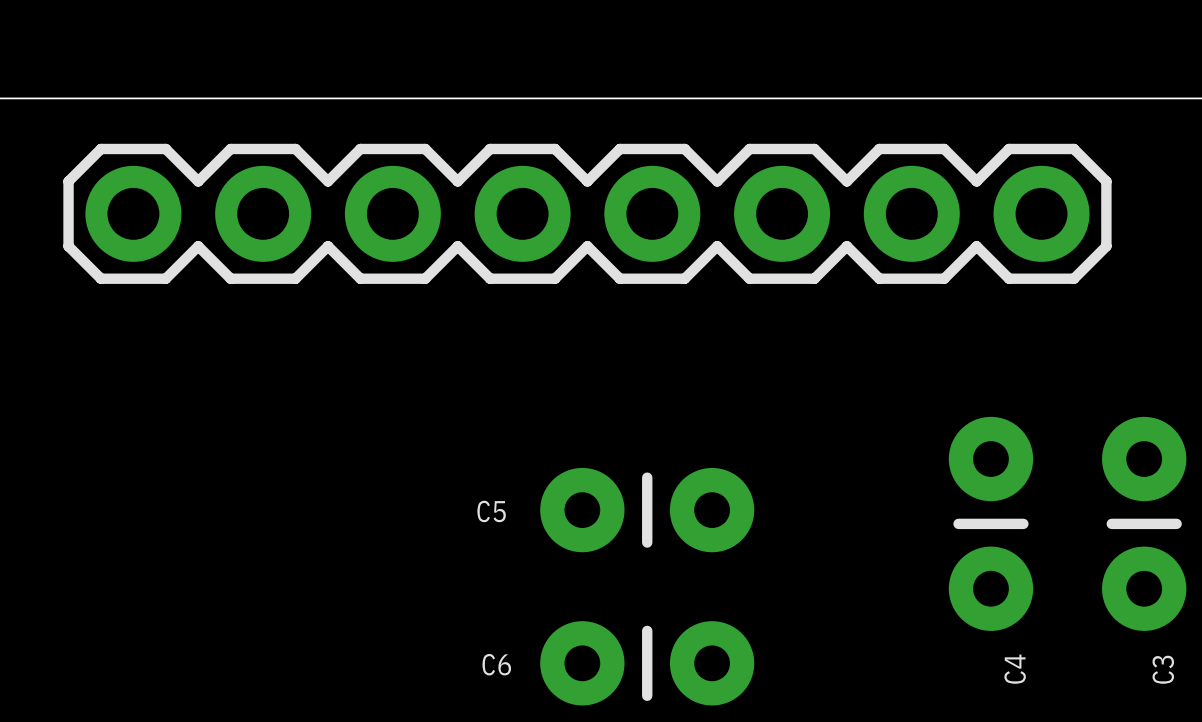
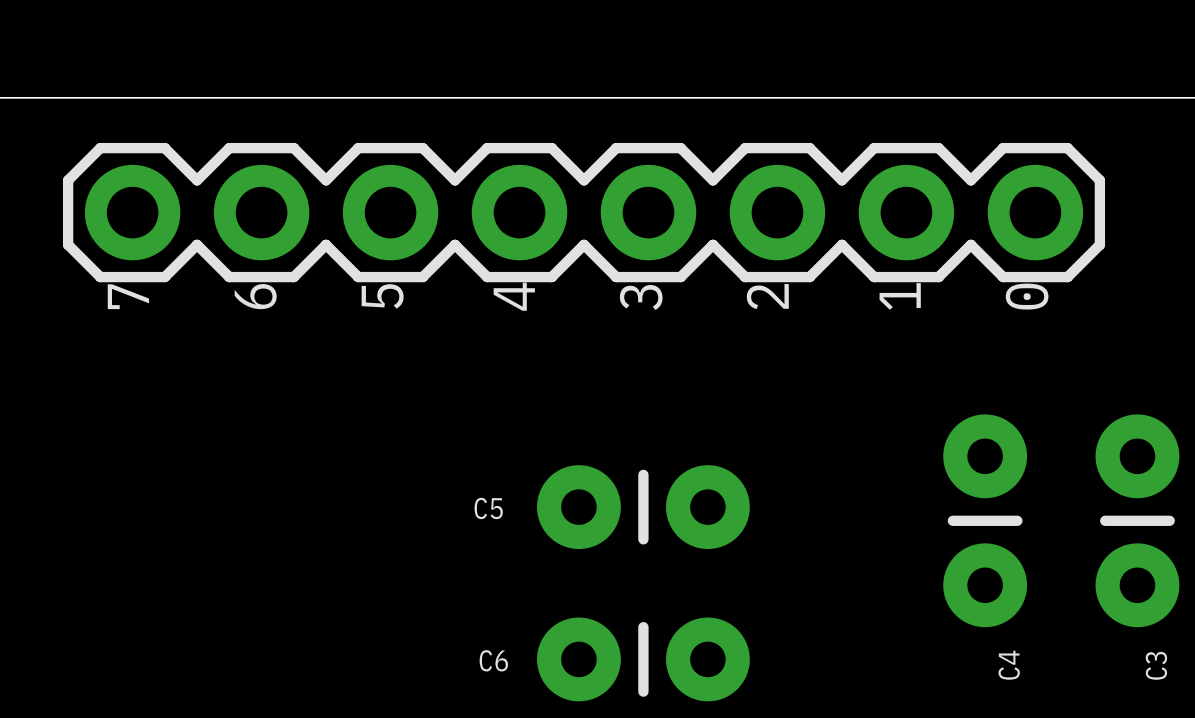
text: none -> 7 (128, 296)
text: none -> 6 (255, 296)
text: none -> 5 (382, 296)
text: none -> 4 (514, 296)
text: none -> 2 (767, 296)
text: none -> 1 (900, 296)
text: none -> 0 (1027, 296)
text: none -> 3 (641, 297)

